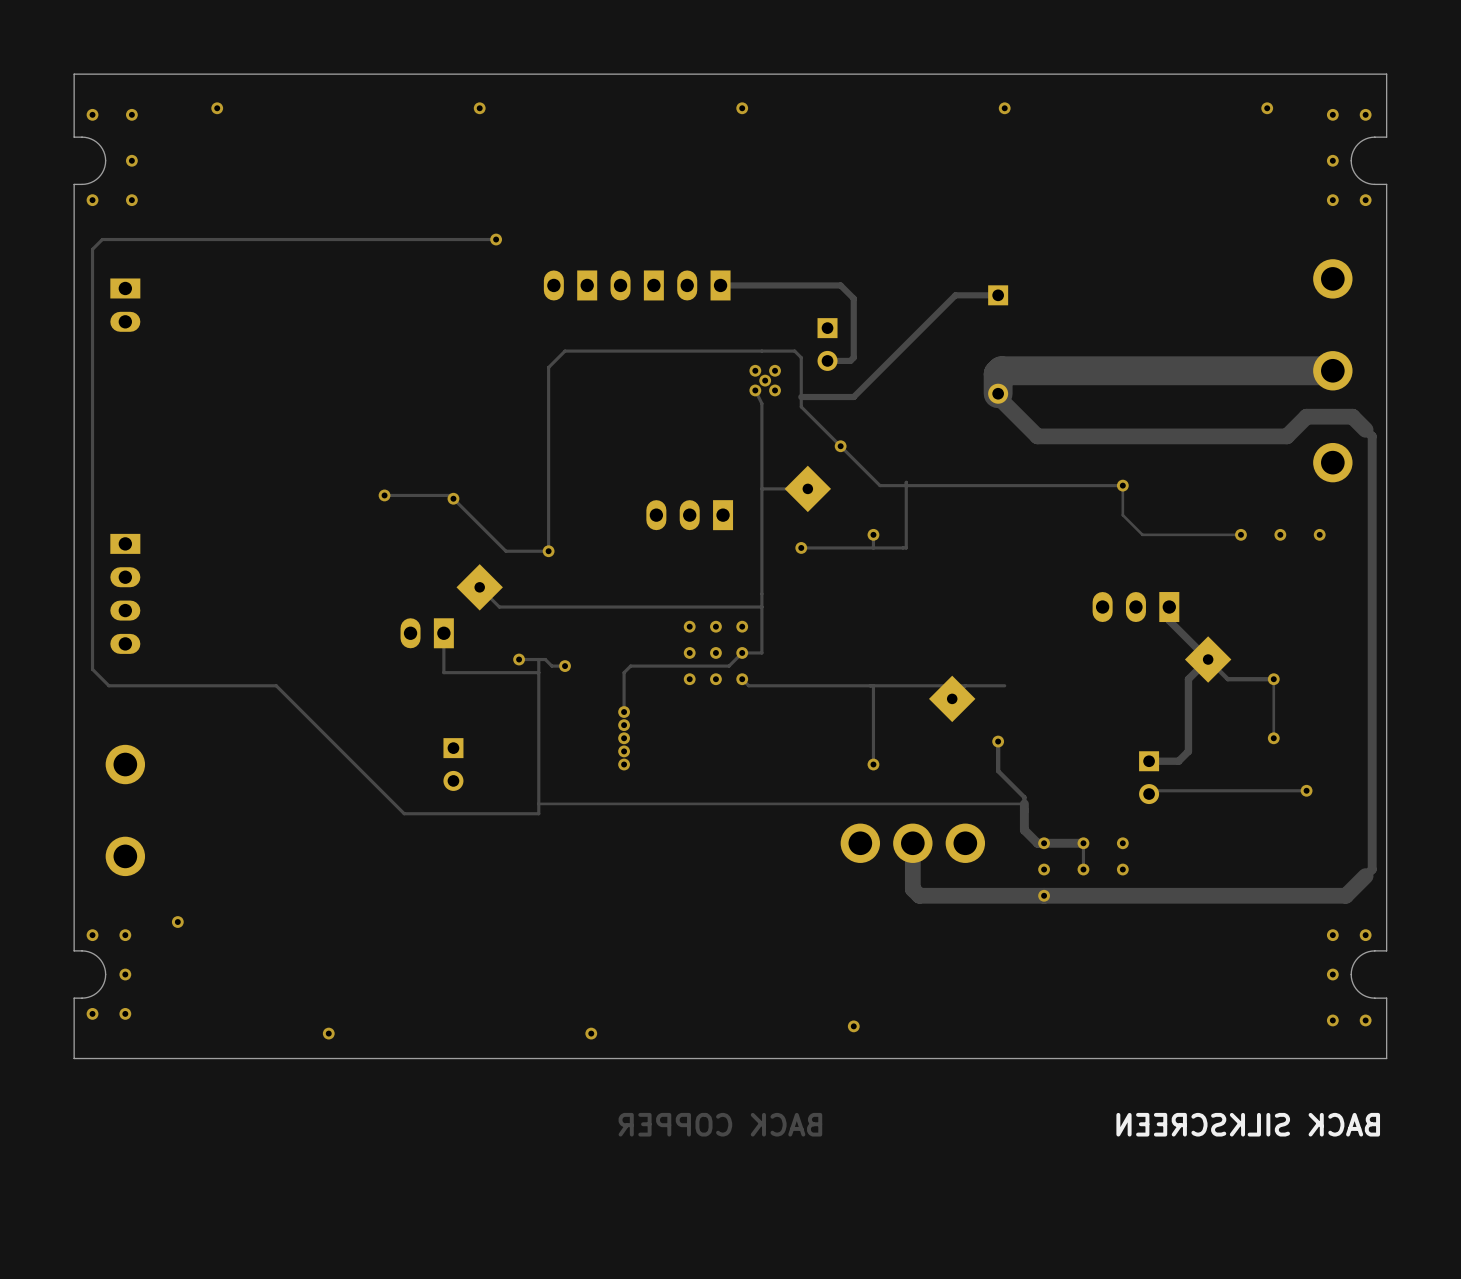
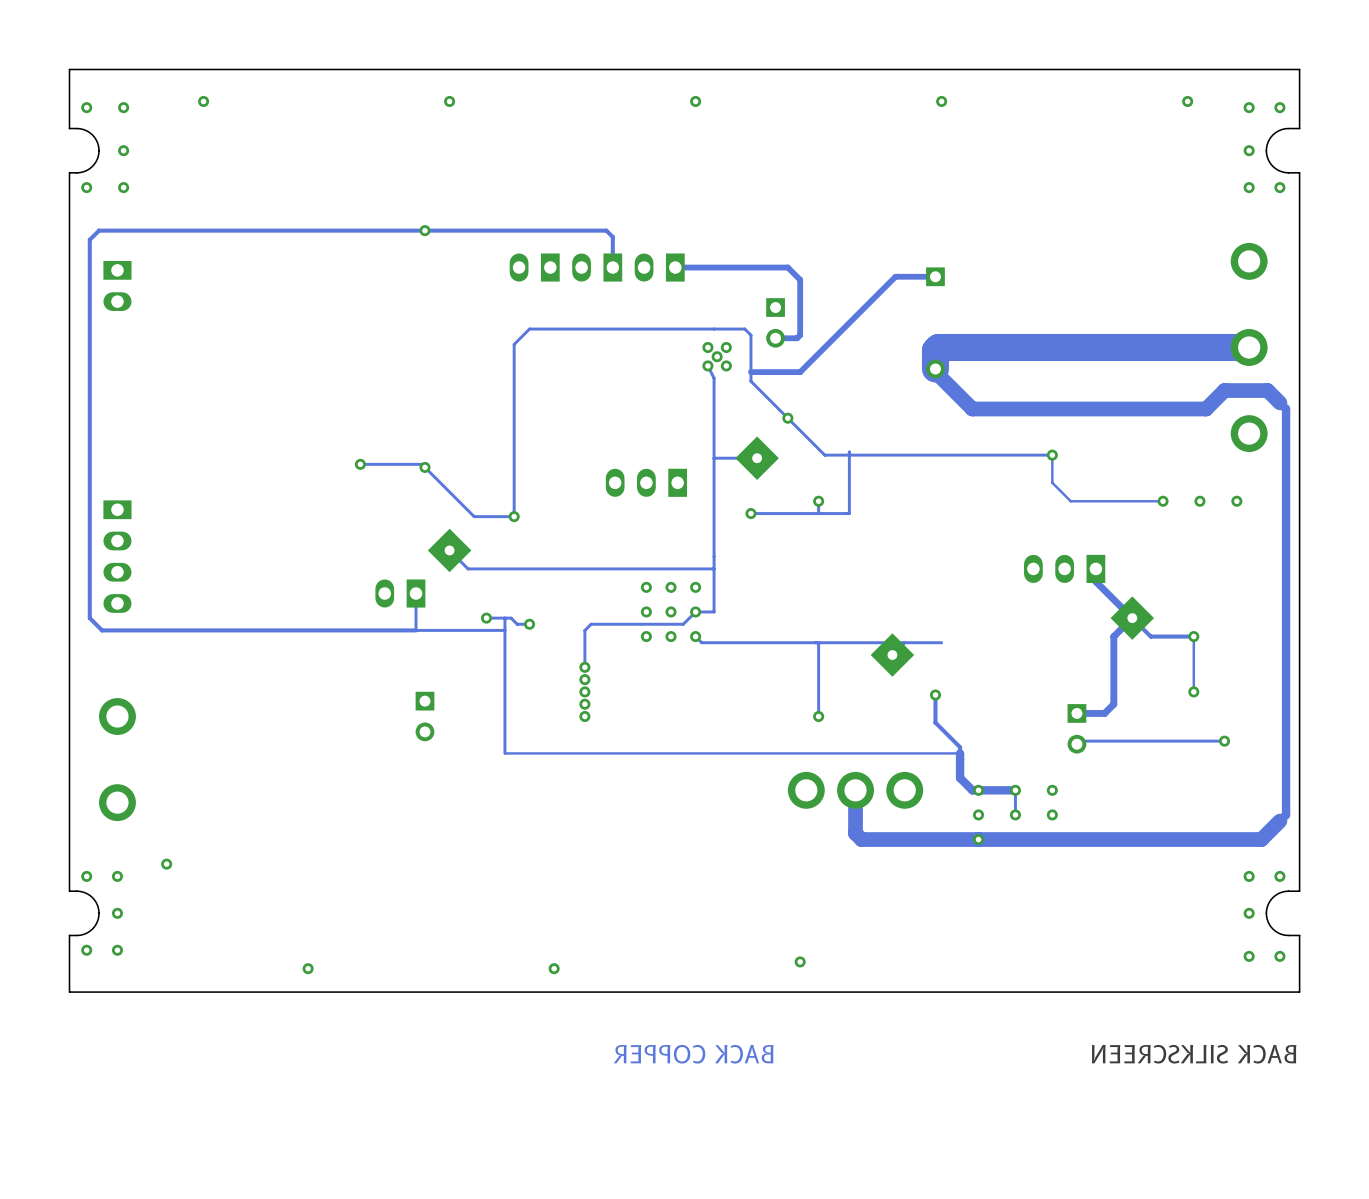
track: (496, 239) (102, 239) (92, 249) (92, 669) (108, 685) (276, 685) (404, 813) (538, 813) (538, 803) -> none
via position: (496, 239) -> (424, 230)
track: none -> (612, 267) (612, 237) (606, 230) (99, 230) (89, 239) (89, 618) (102, 630) (416, 630)

